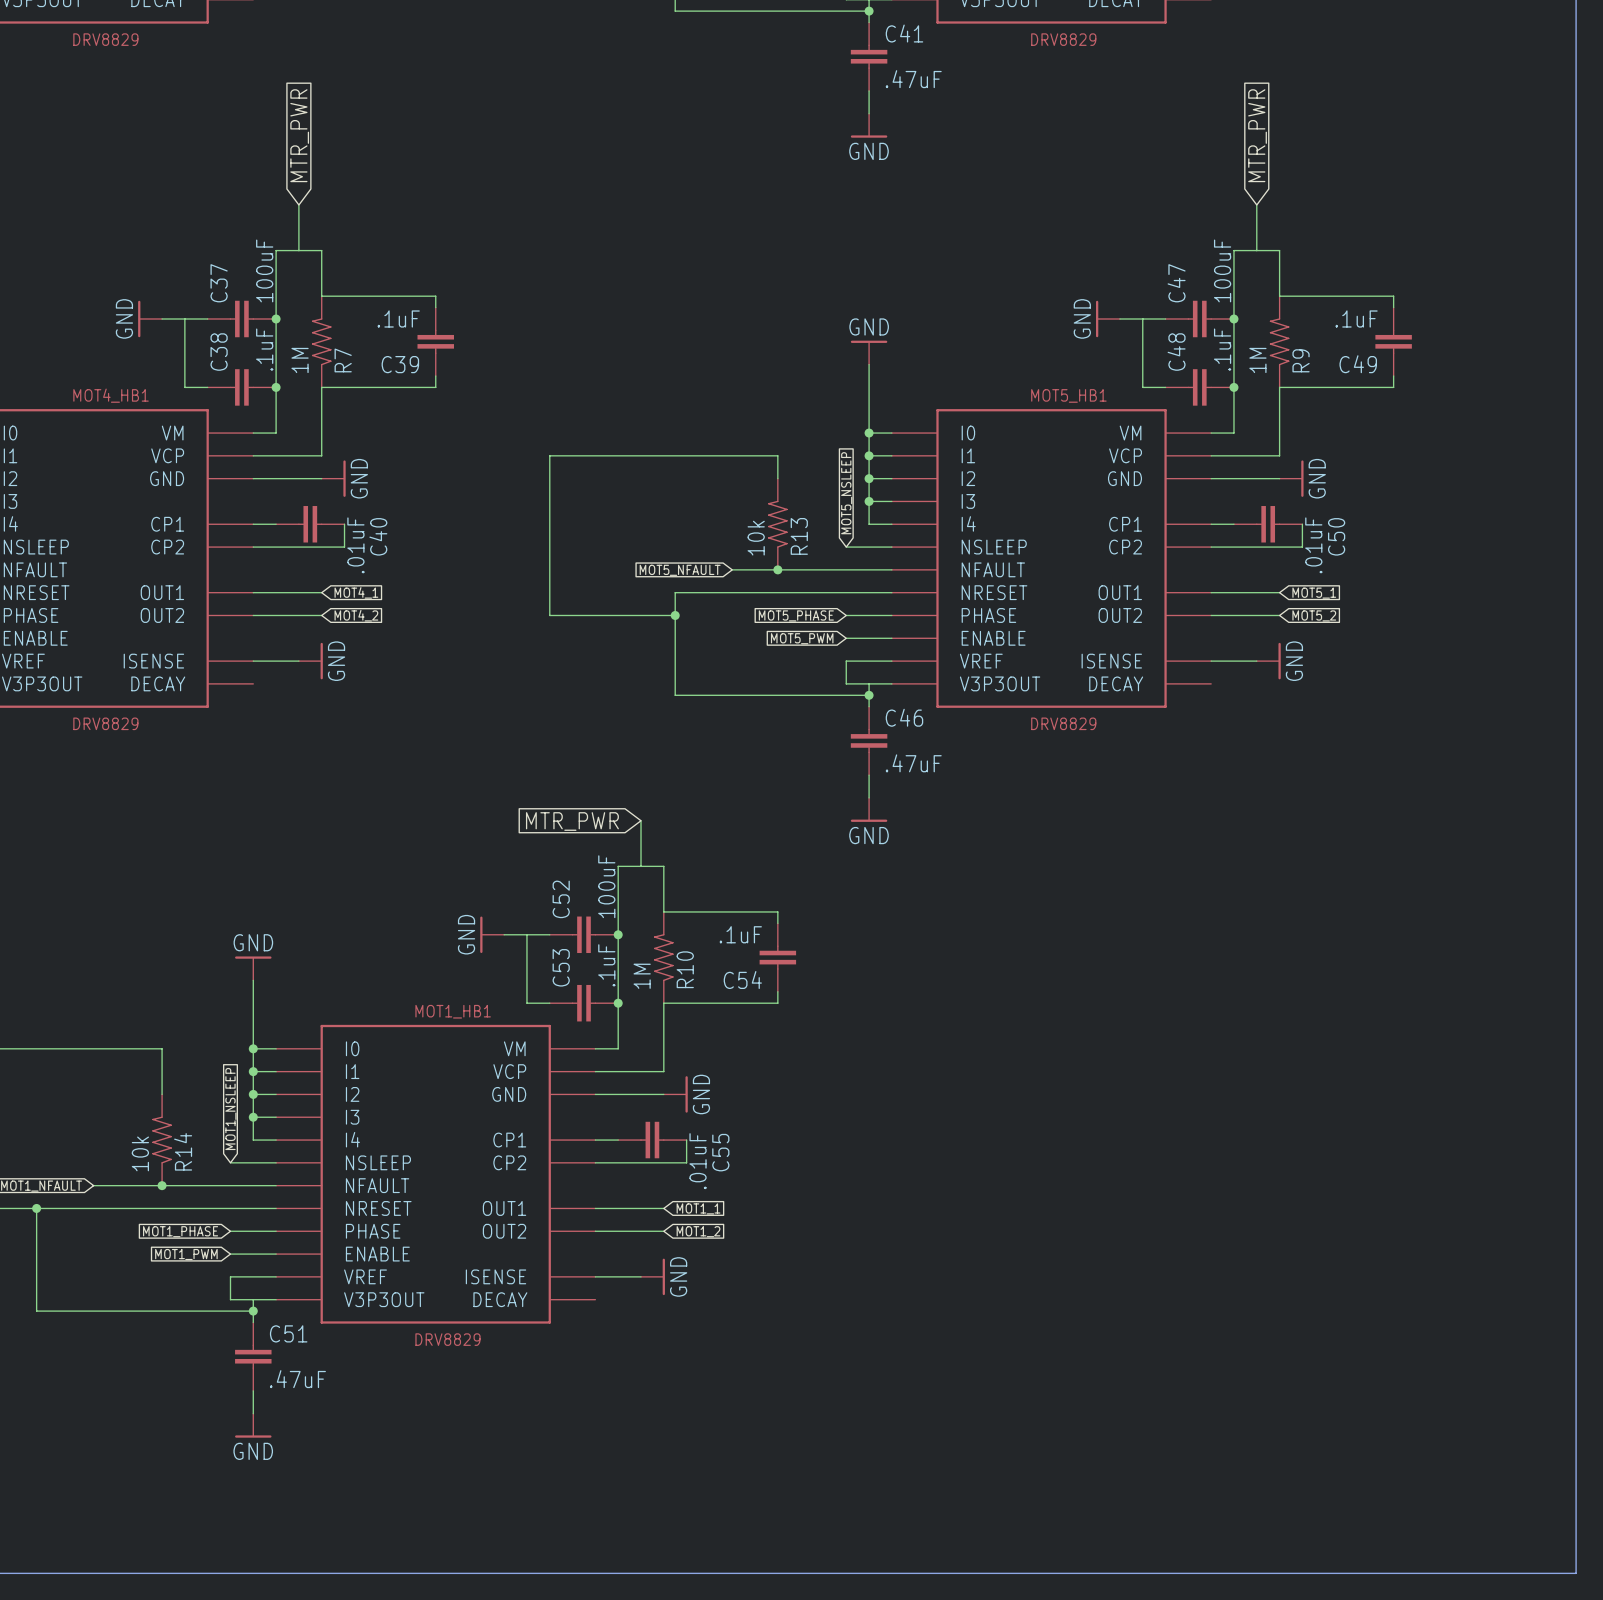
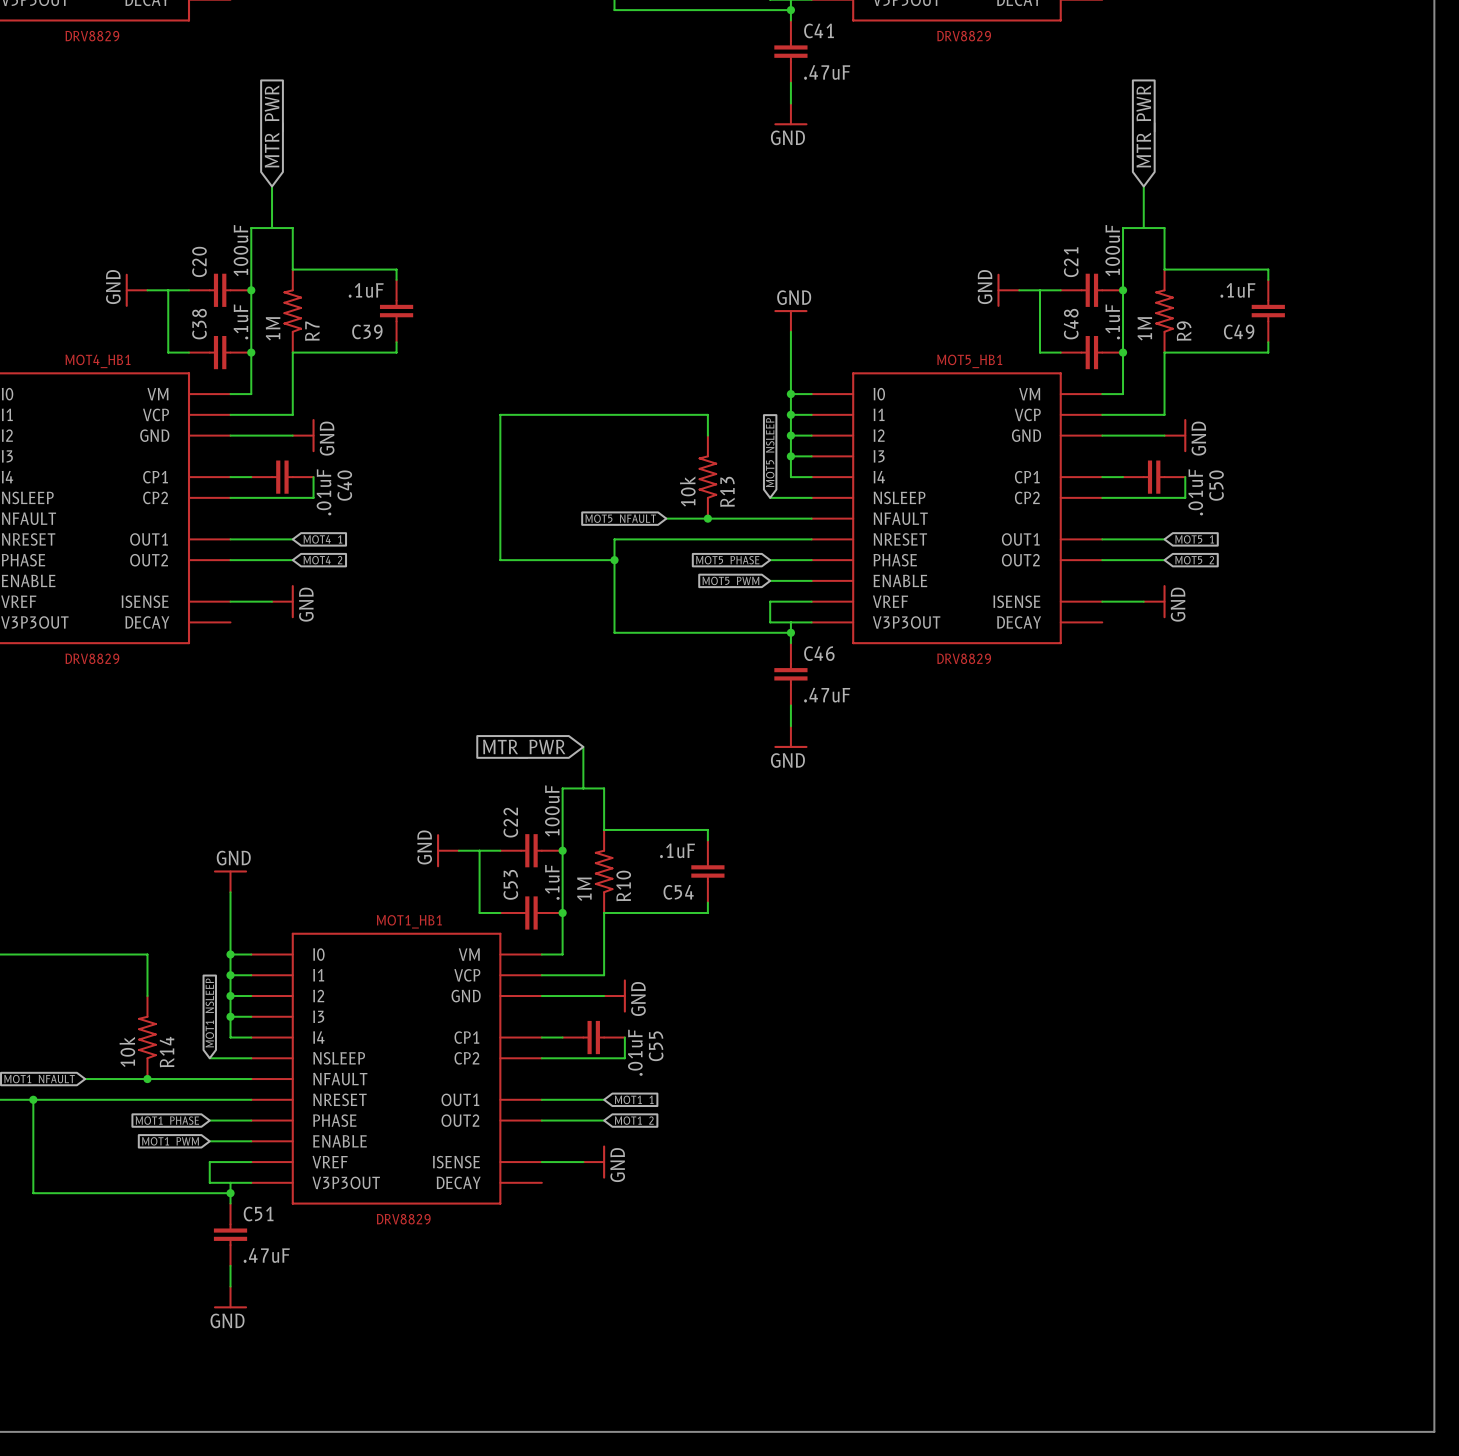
C37 name: C37 (219, 283) -> C20 (199, 261)
C47 name: C47 (1176, 283) -> C21 (1071, 262)
C52 name: C52 (561, 899) -> C22 (510, 822)

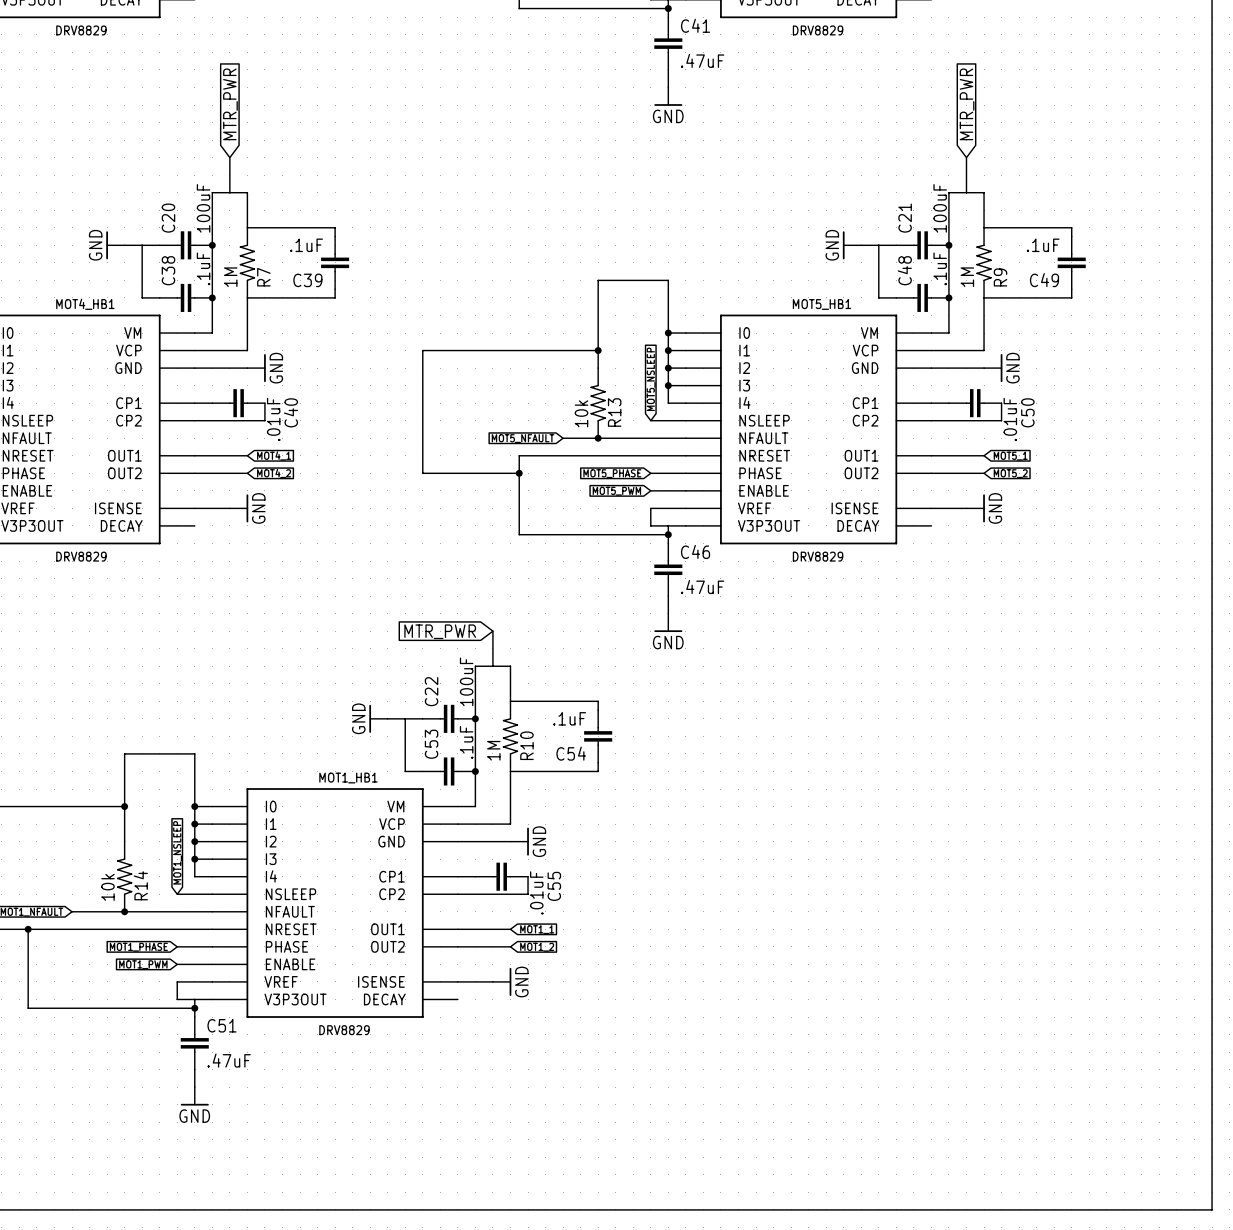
power symbol: GND (790, 320) -> none
wire: none -> (668, 280) (598, 280) (598, 350)
junction: none -> (598, 350)
power symbol: GND (230, 881) -> none
wire: none -> (194, 753) (124, 753) (124, 806)
junction: none -> (124, 806)

